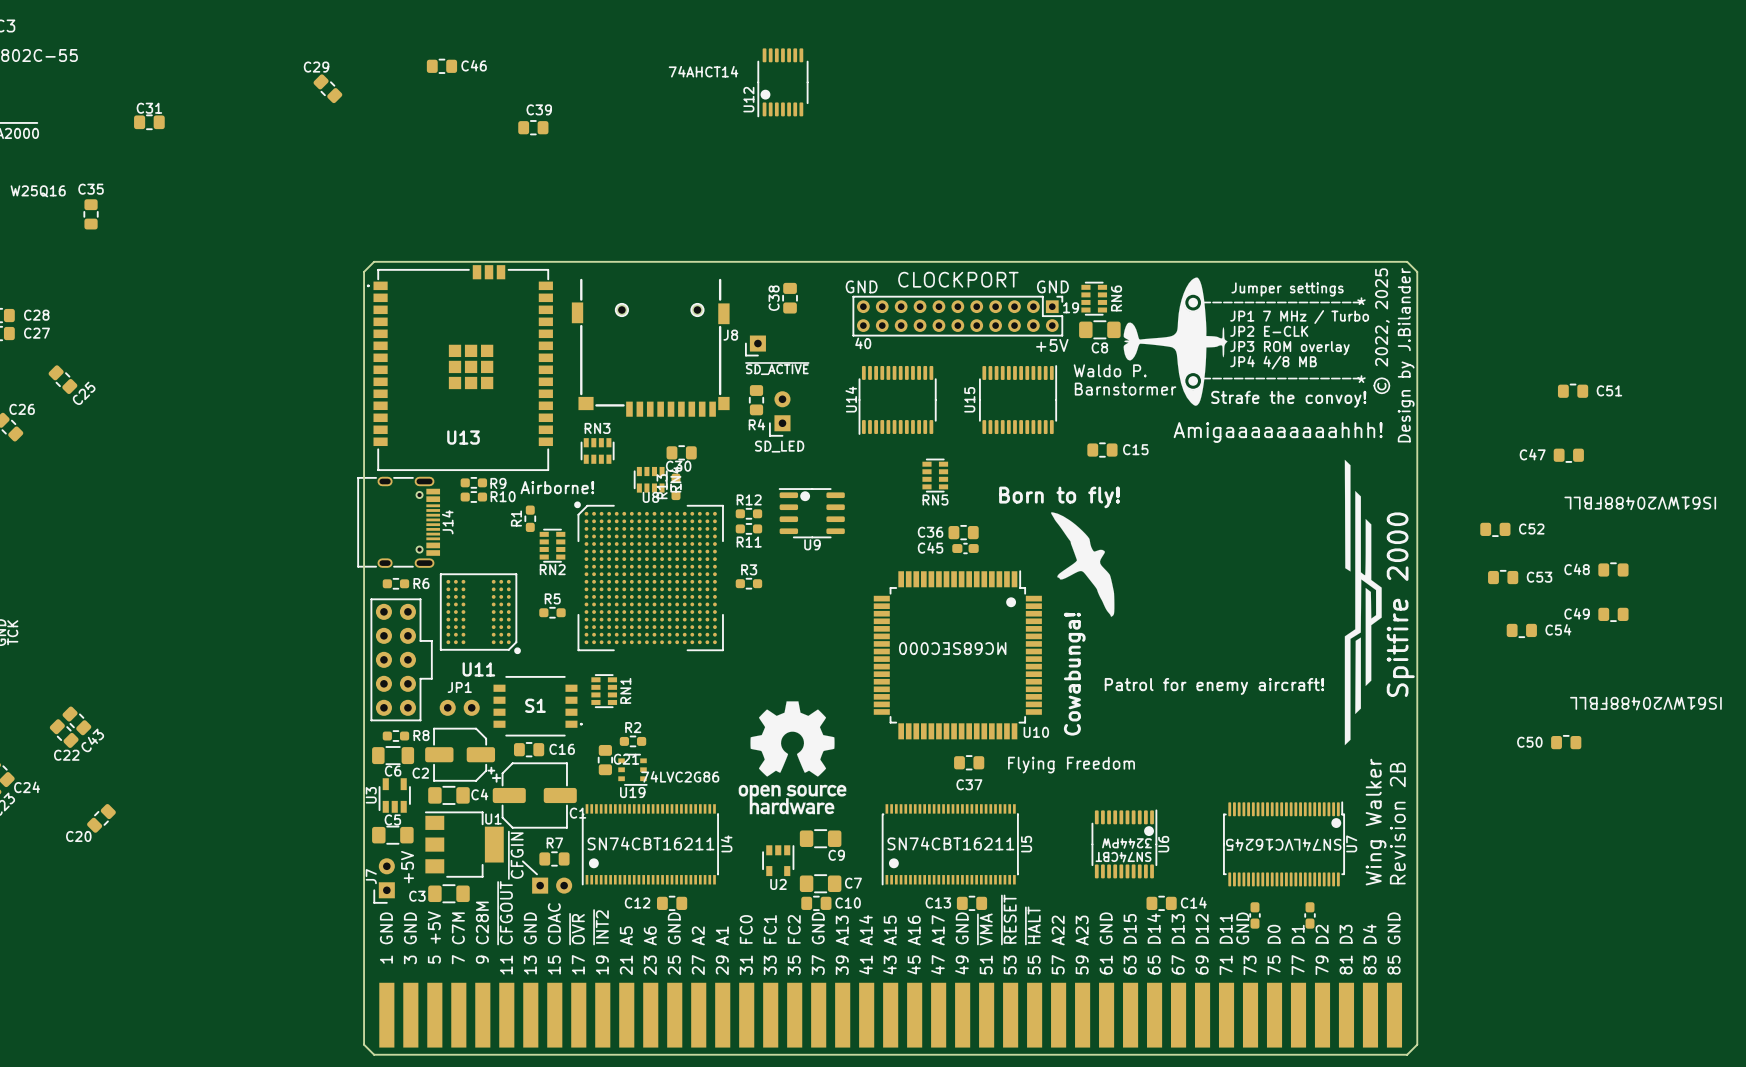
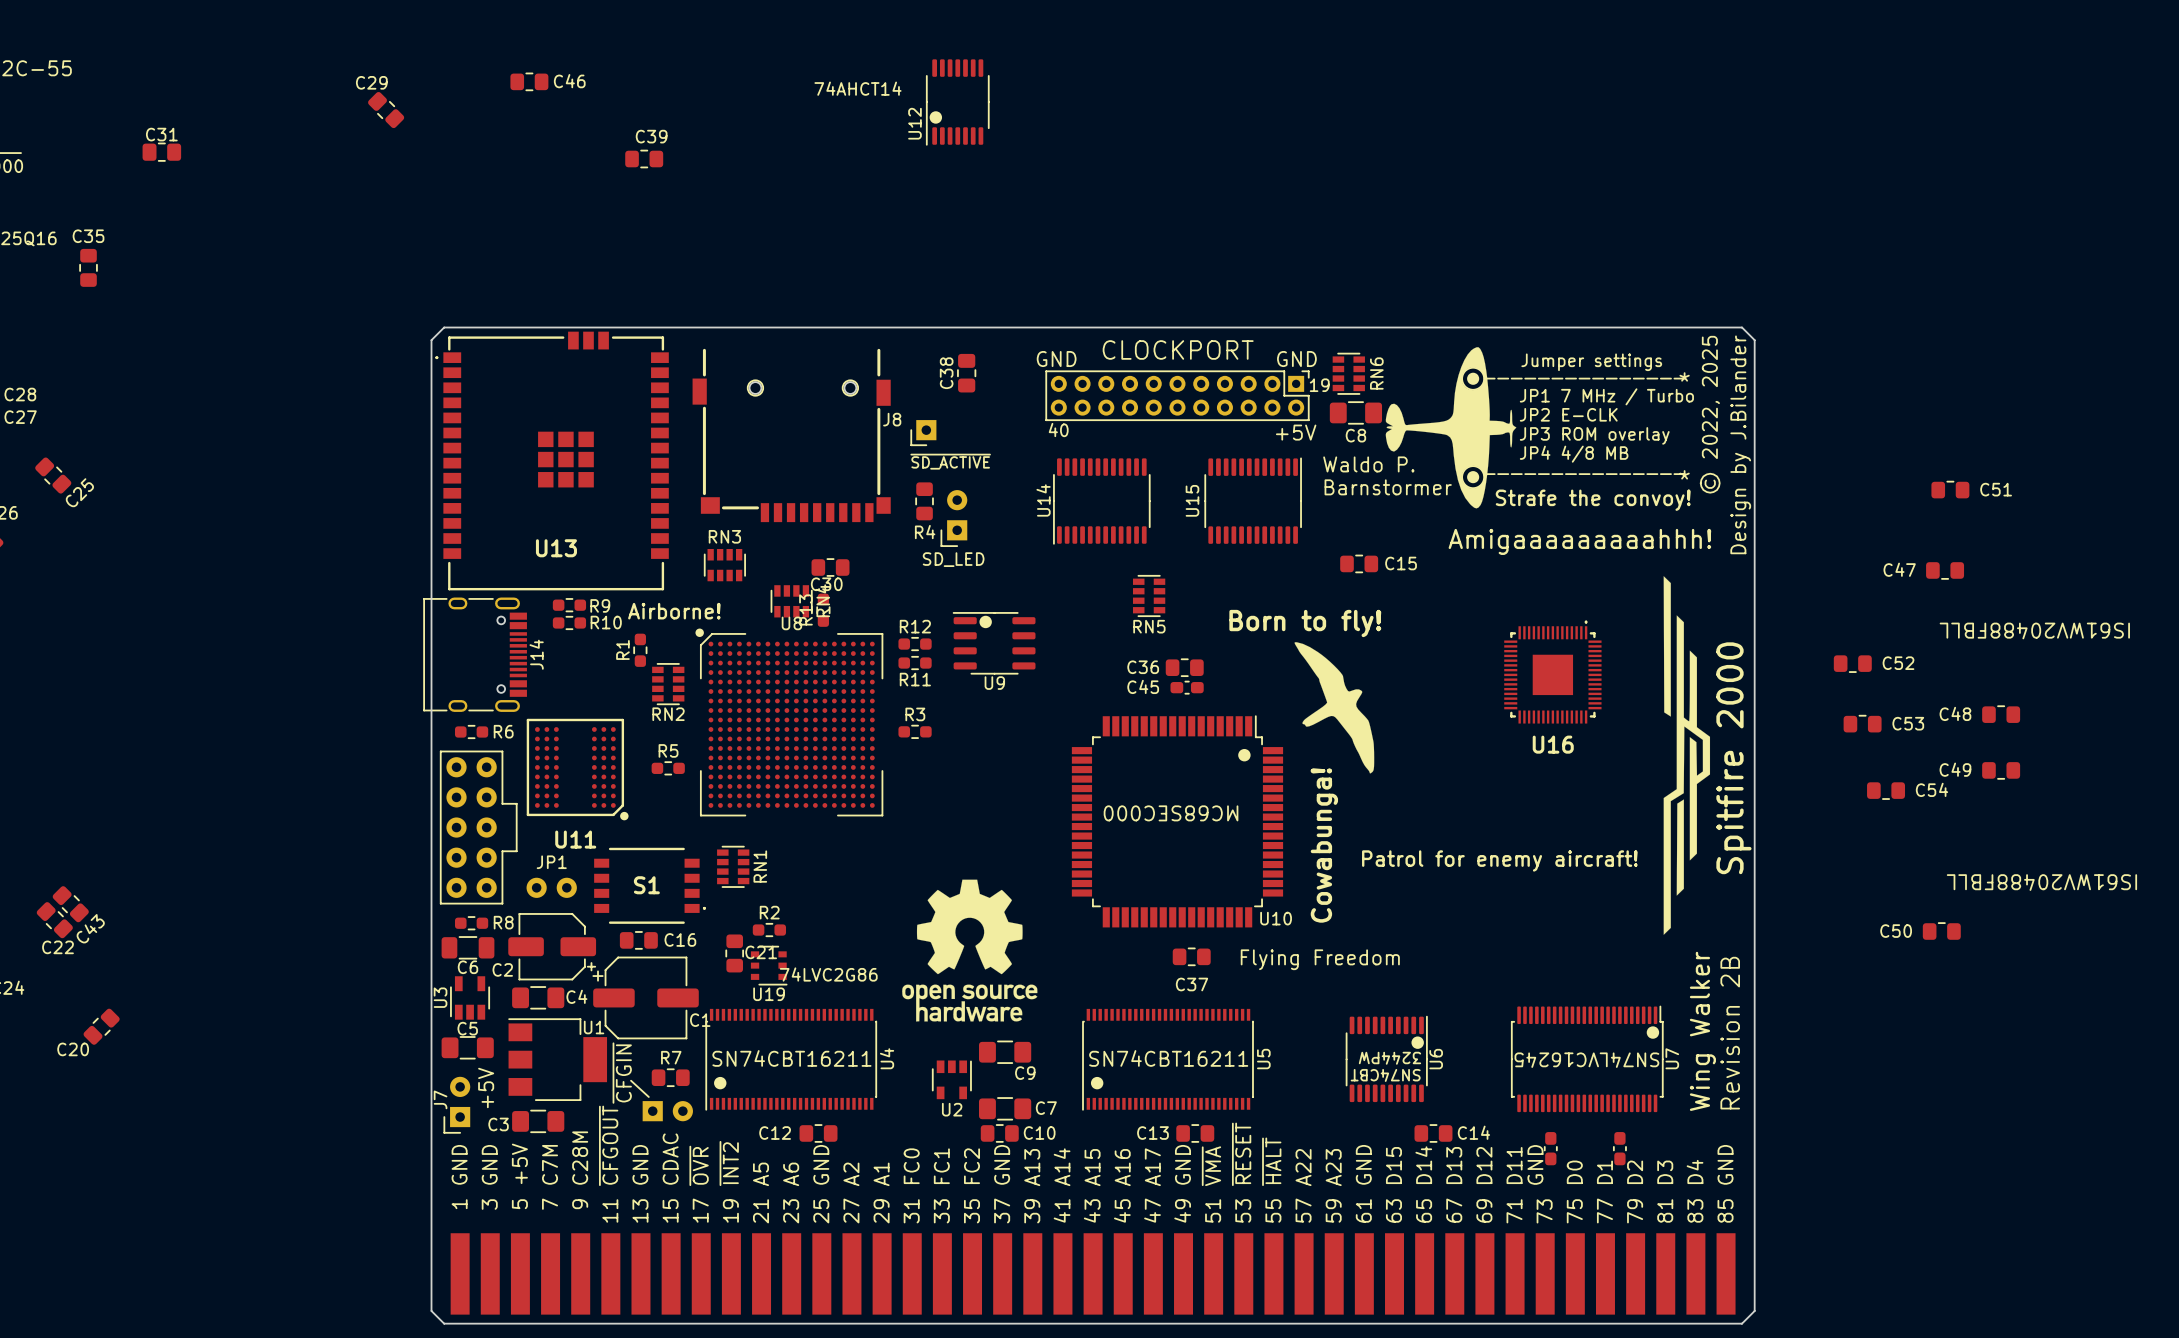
U16: none -> (1552, 672)

